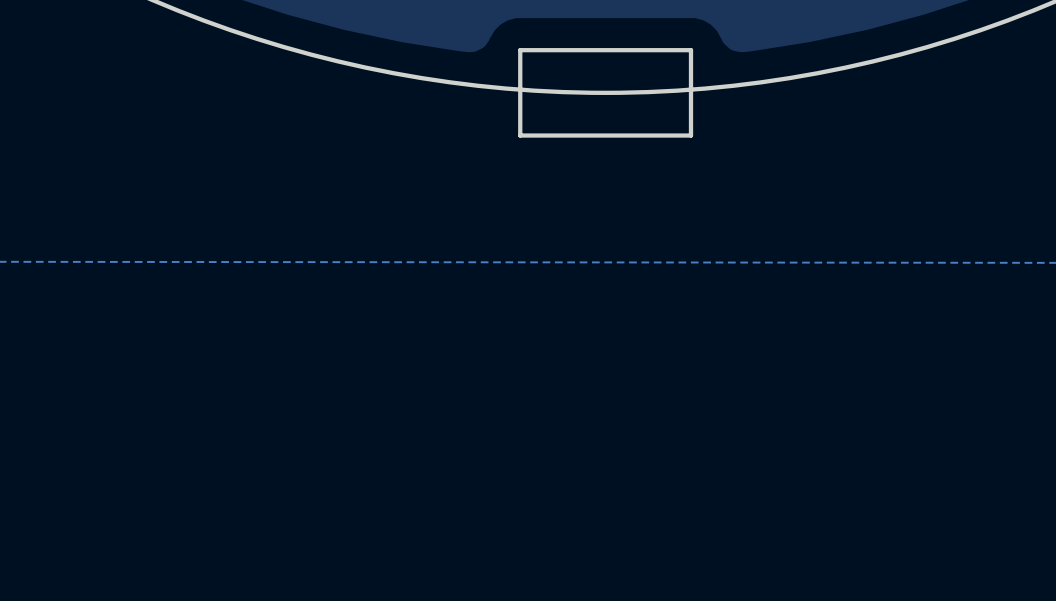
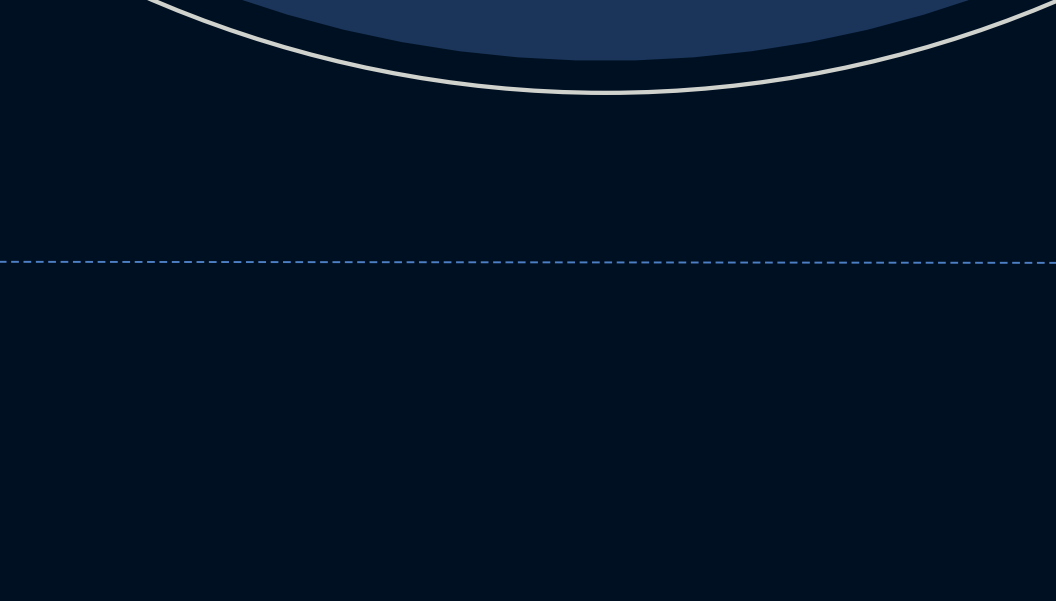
board edge: (520, 50) (691, 50) (691, 135) (520, 135) (520, 50) -> none

